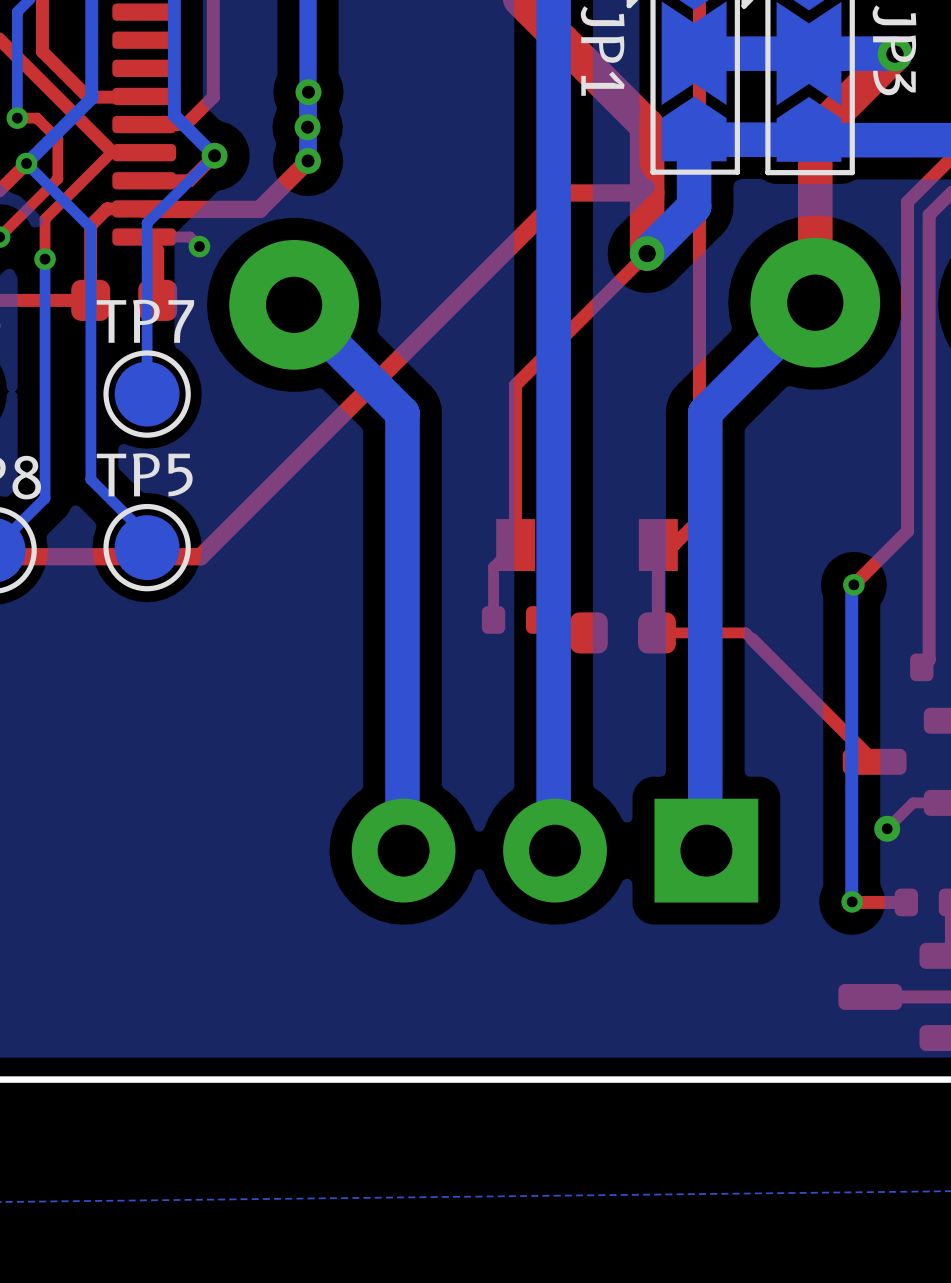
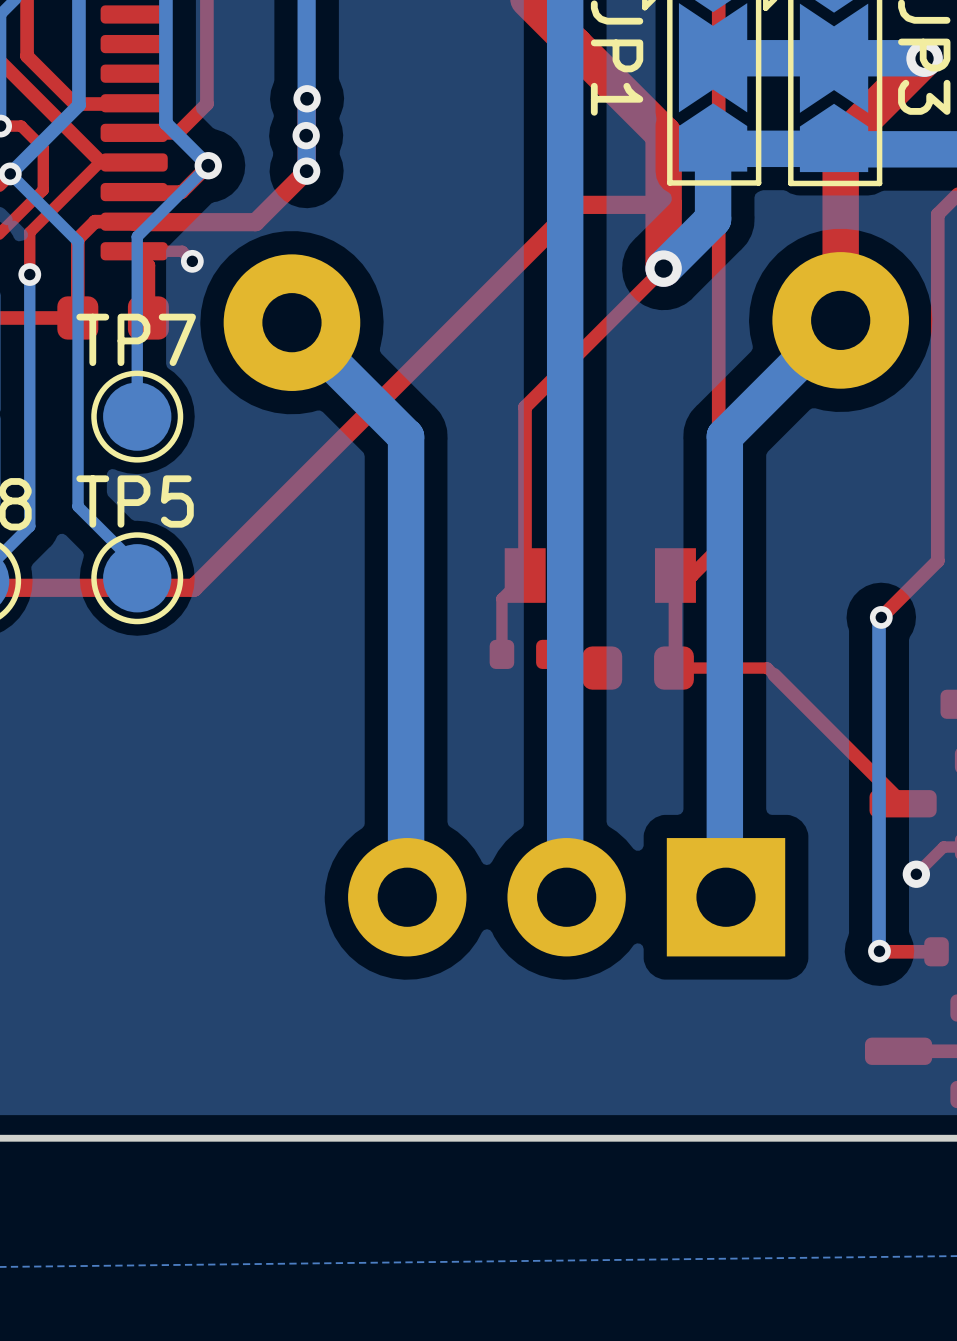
part footprint: [351, 798, 759, 903] -> [348, 838, 786, 957]

